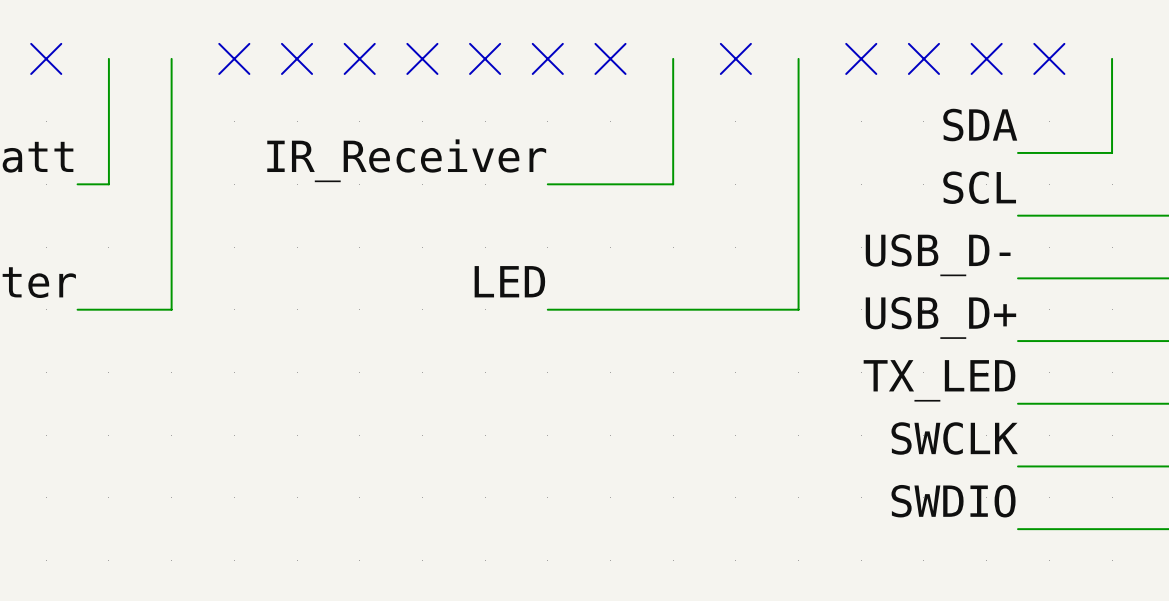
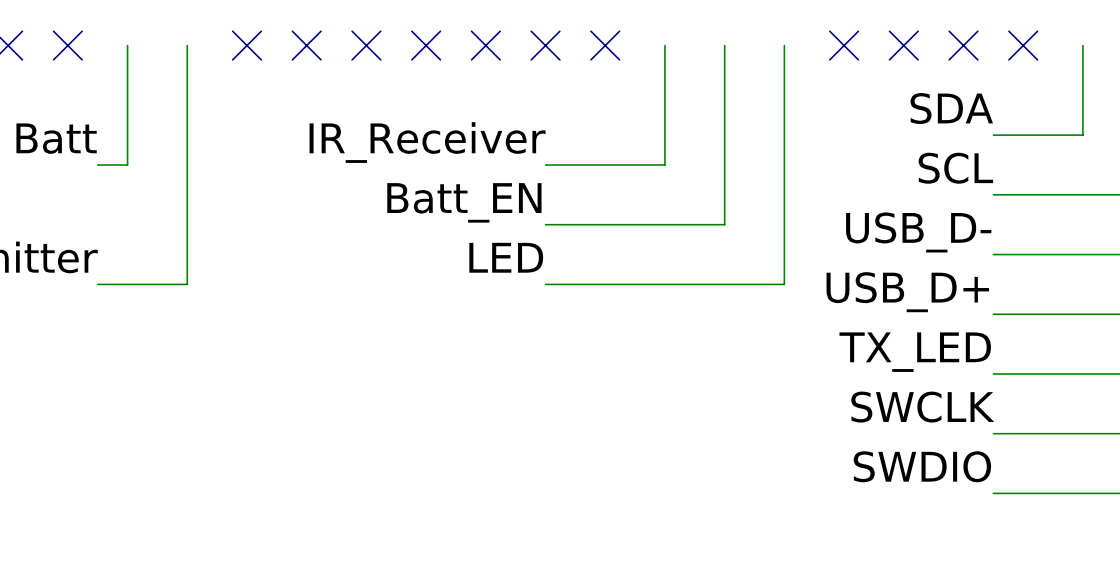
wire: none -> (724, 45) (724, 224) (545, 224)
no-connect mark: (735, 58) -> none
label: none -> Batt_EN (464, 202)

